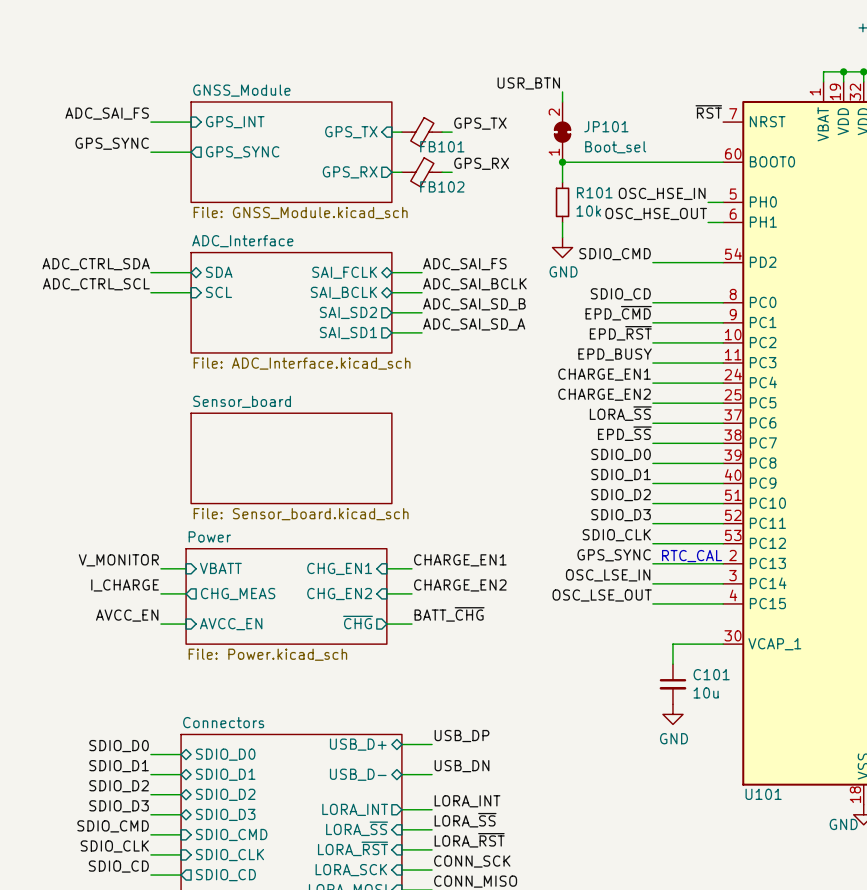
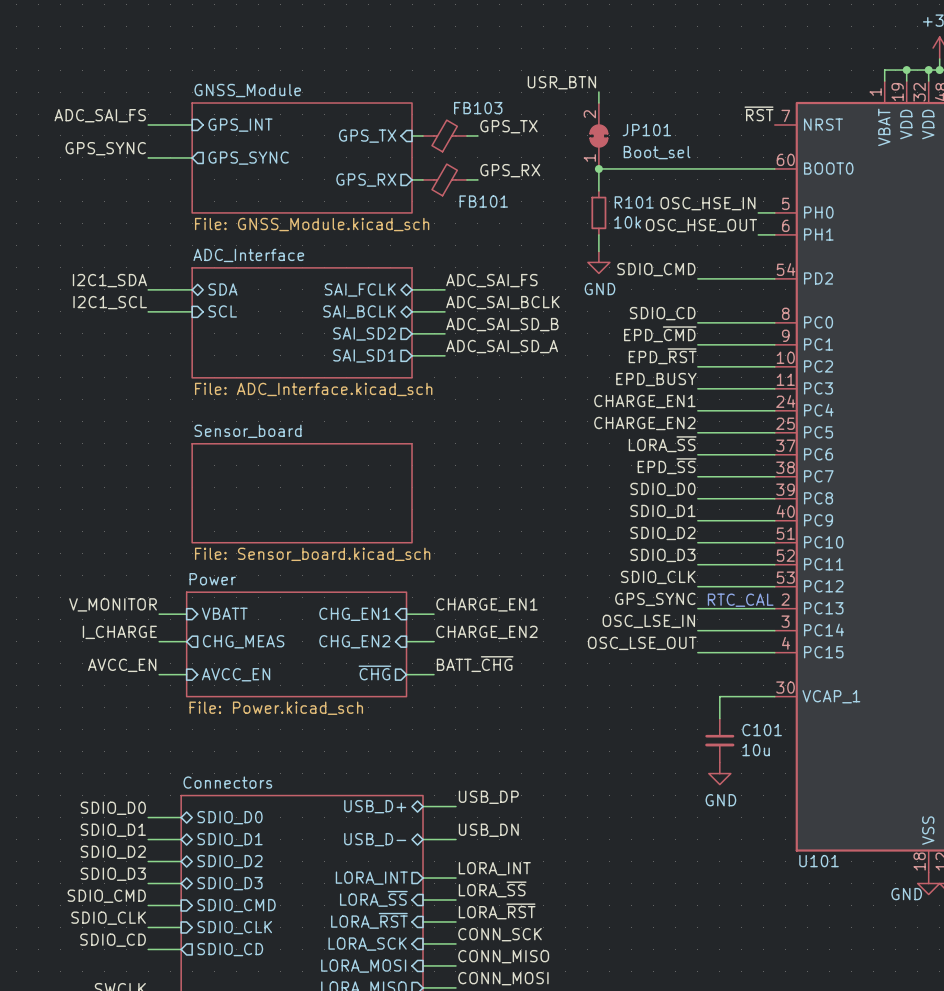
FB101 rotation: 0° (422, 132) -> 180° (444, 179)
FB101 position: (422, 132) -> (444, 179)
FB103: none -> (444, 135)
FB101 name position: FB101 (442, 146) -> FB101 (483, 201)
FB102: (422, 172) -> none
label: ADC_CTRL_SDA (96, 264) -> I2C1_SDA (109, 280)
label: ADC_CTRL_SCL (96, 284) -> I2C1_SCL (110, 302)

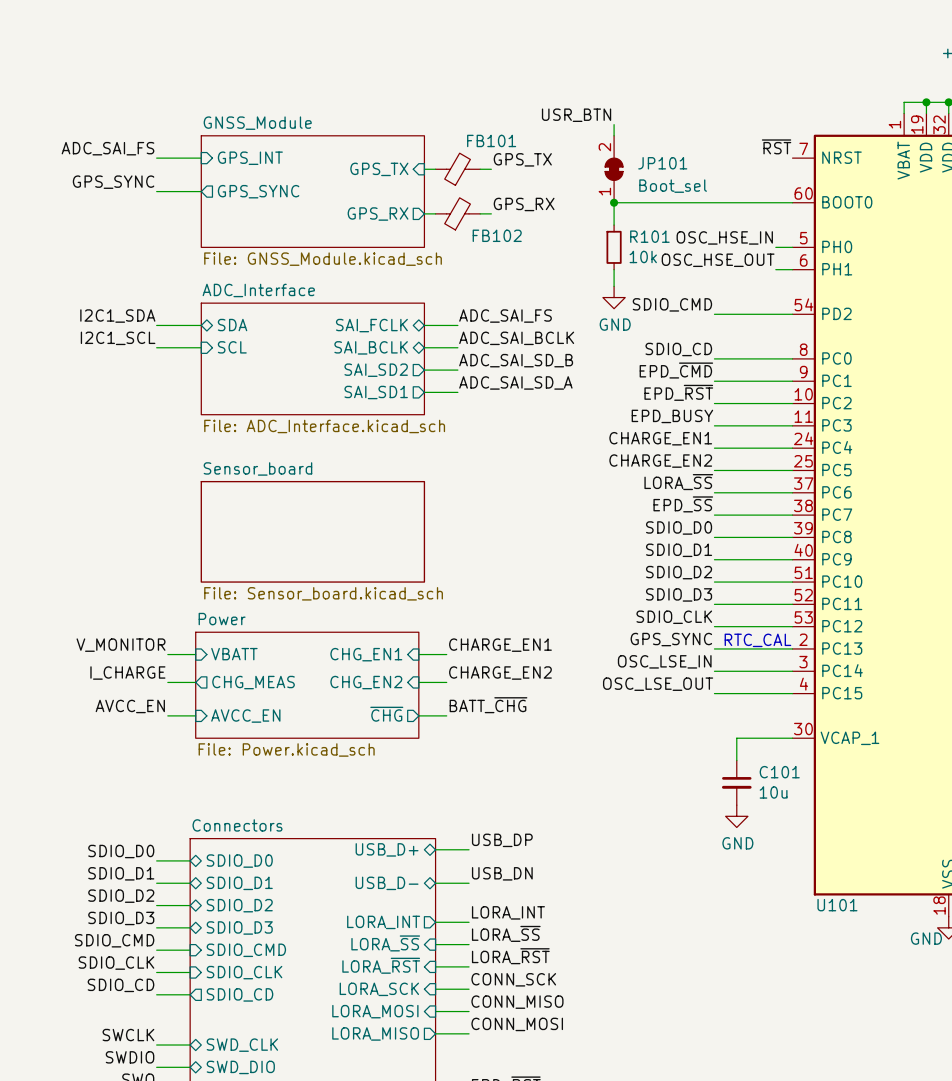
FB103 name: FB103 (478, 108) -> FB101 (491, 140)
FB101 name: FB101 (483, 201) -> FB102 (497, 235)

